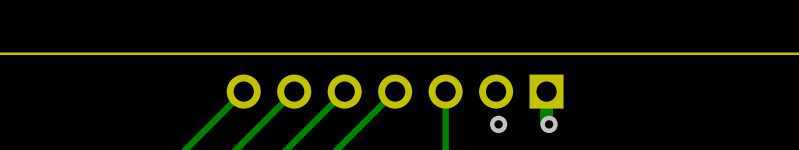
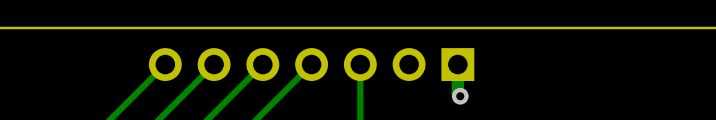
via: (498, 124) -> none

